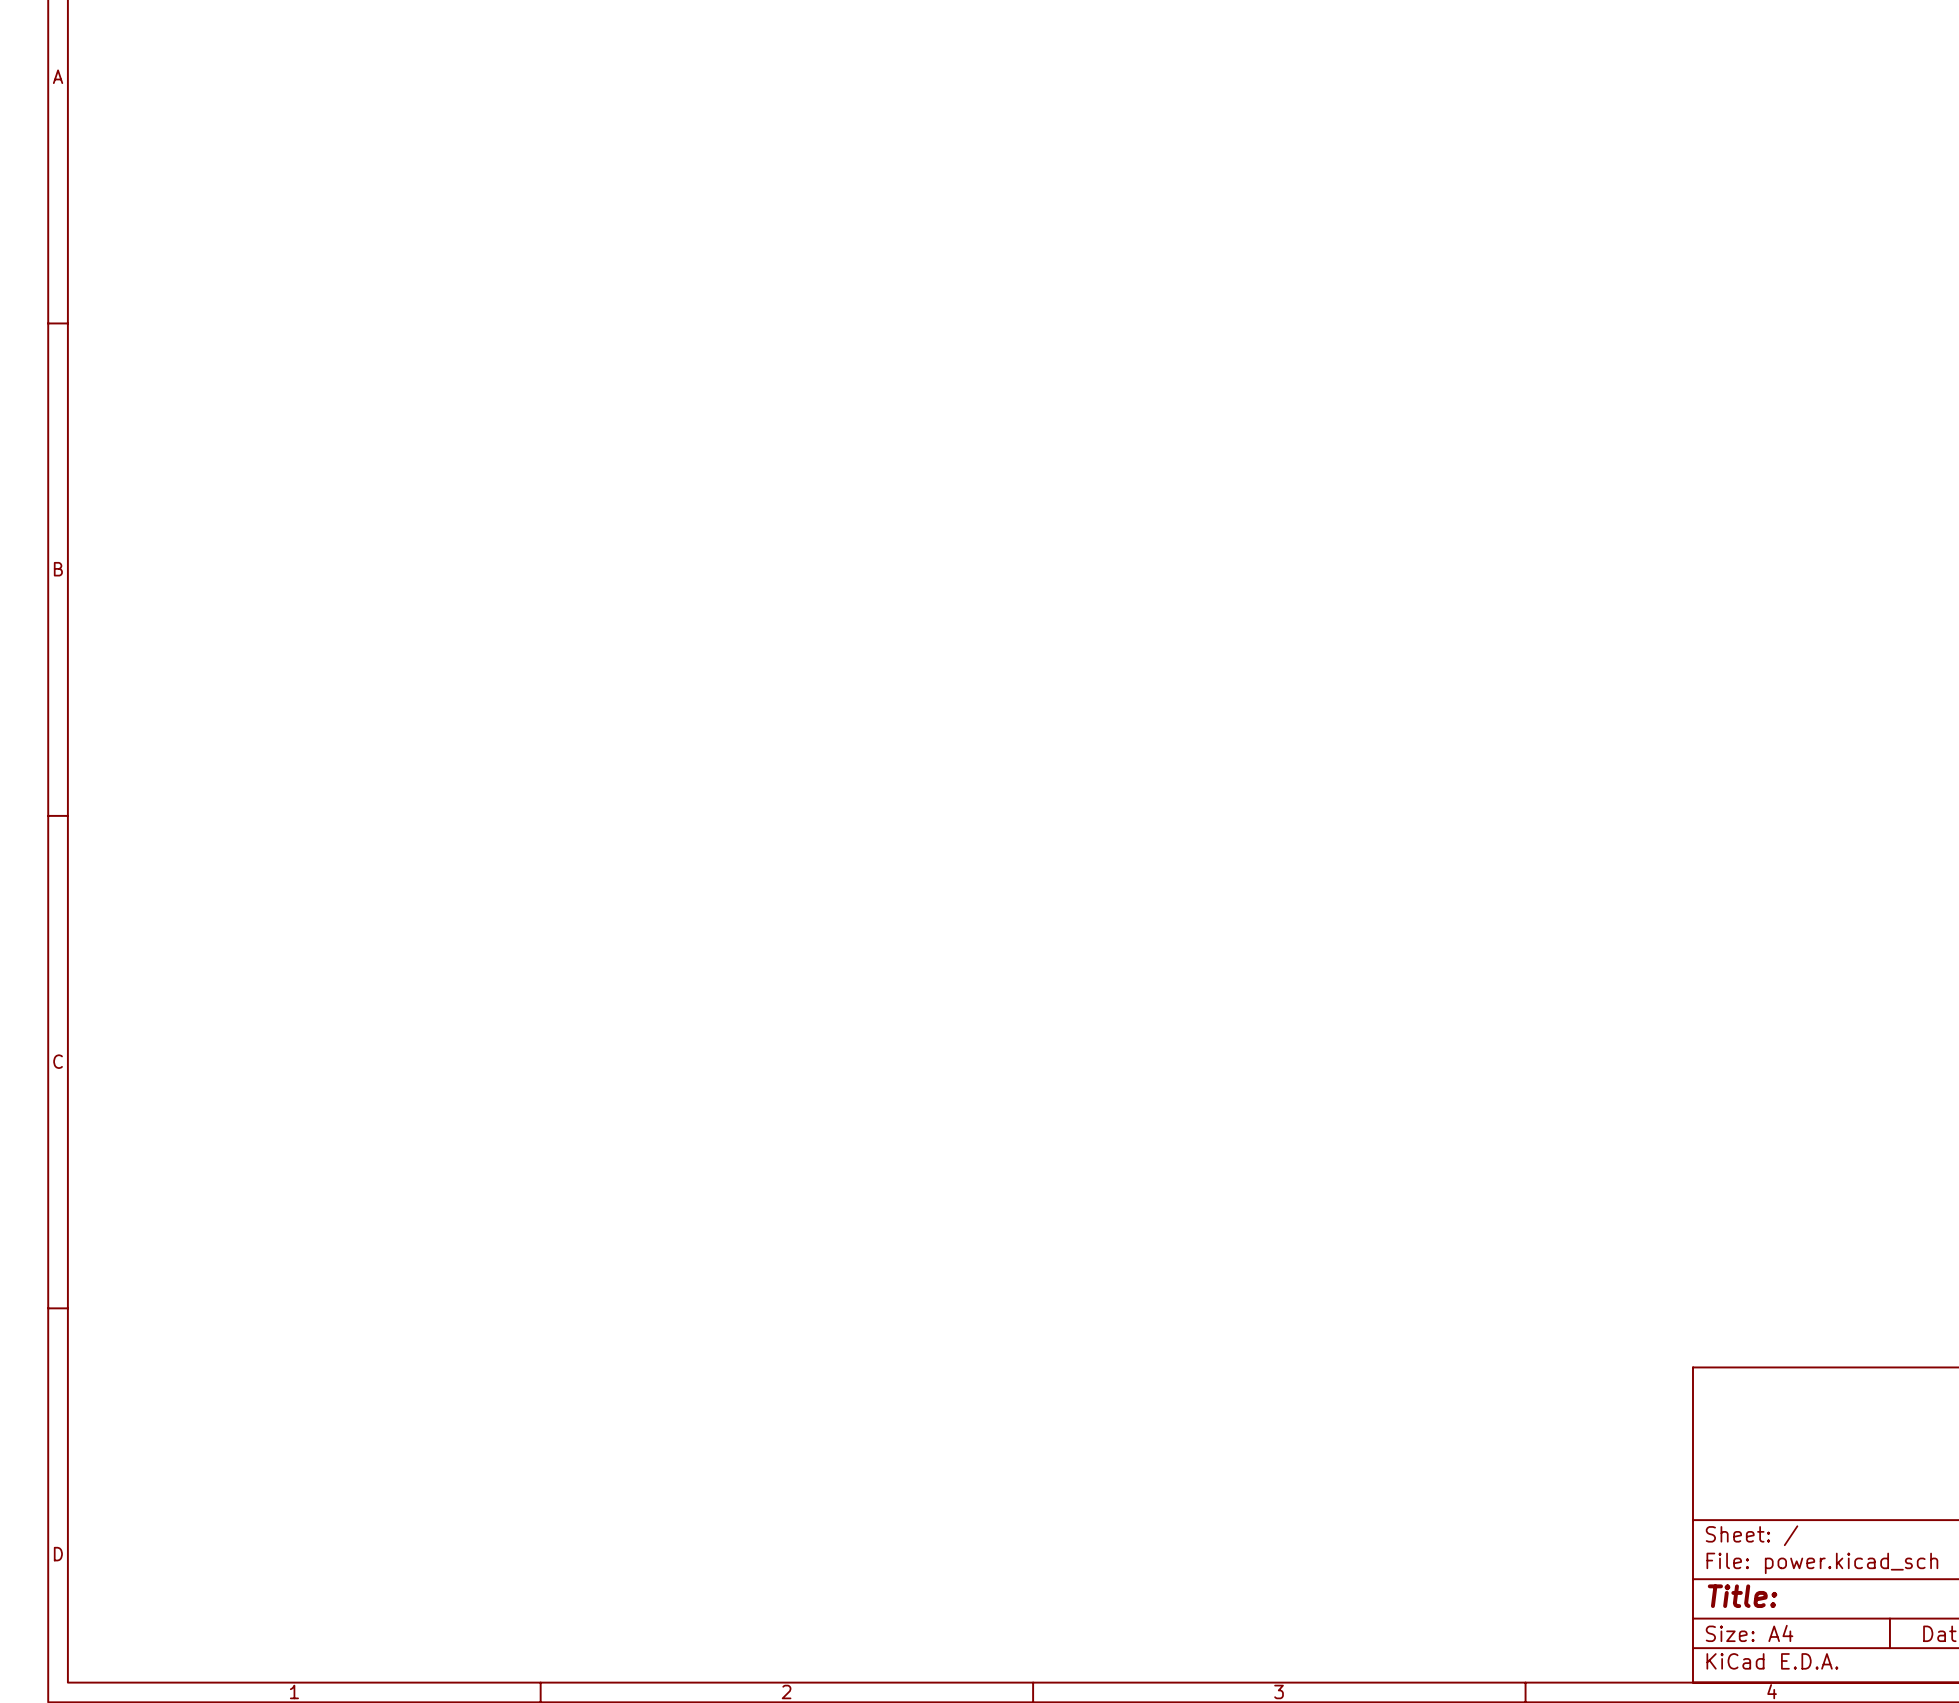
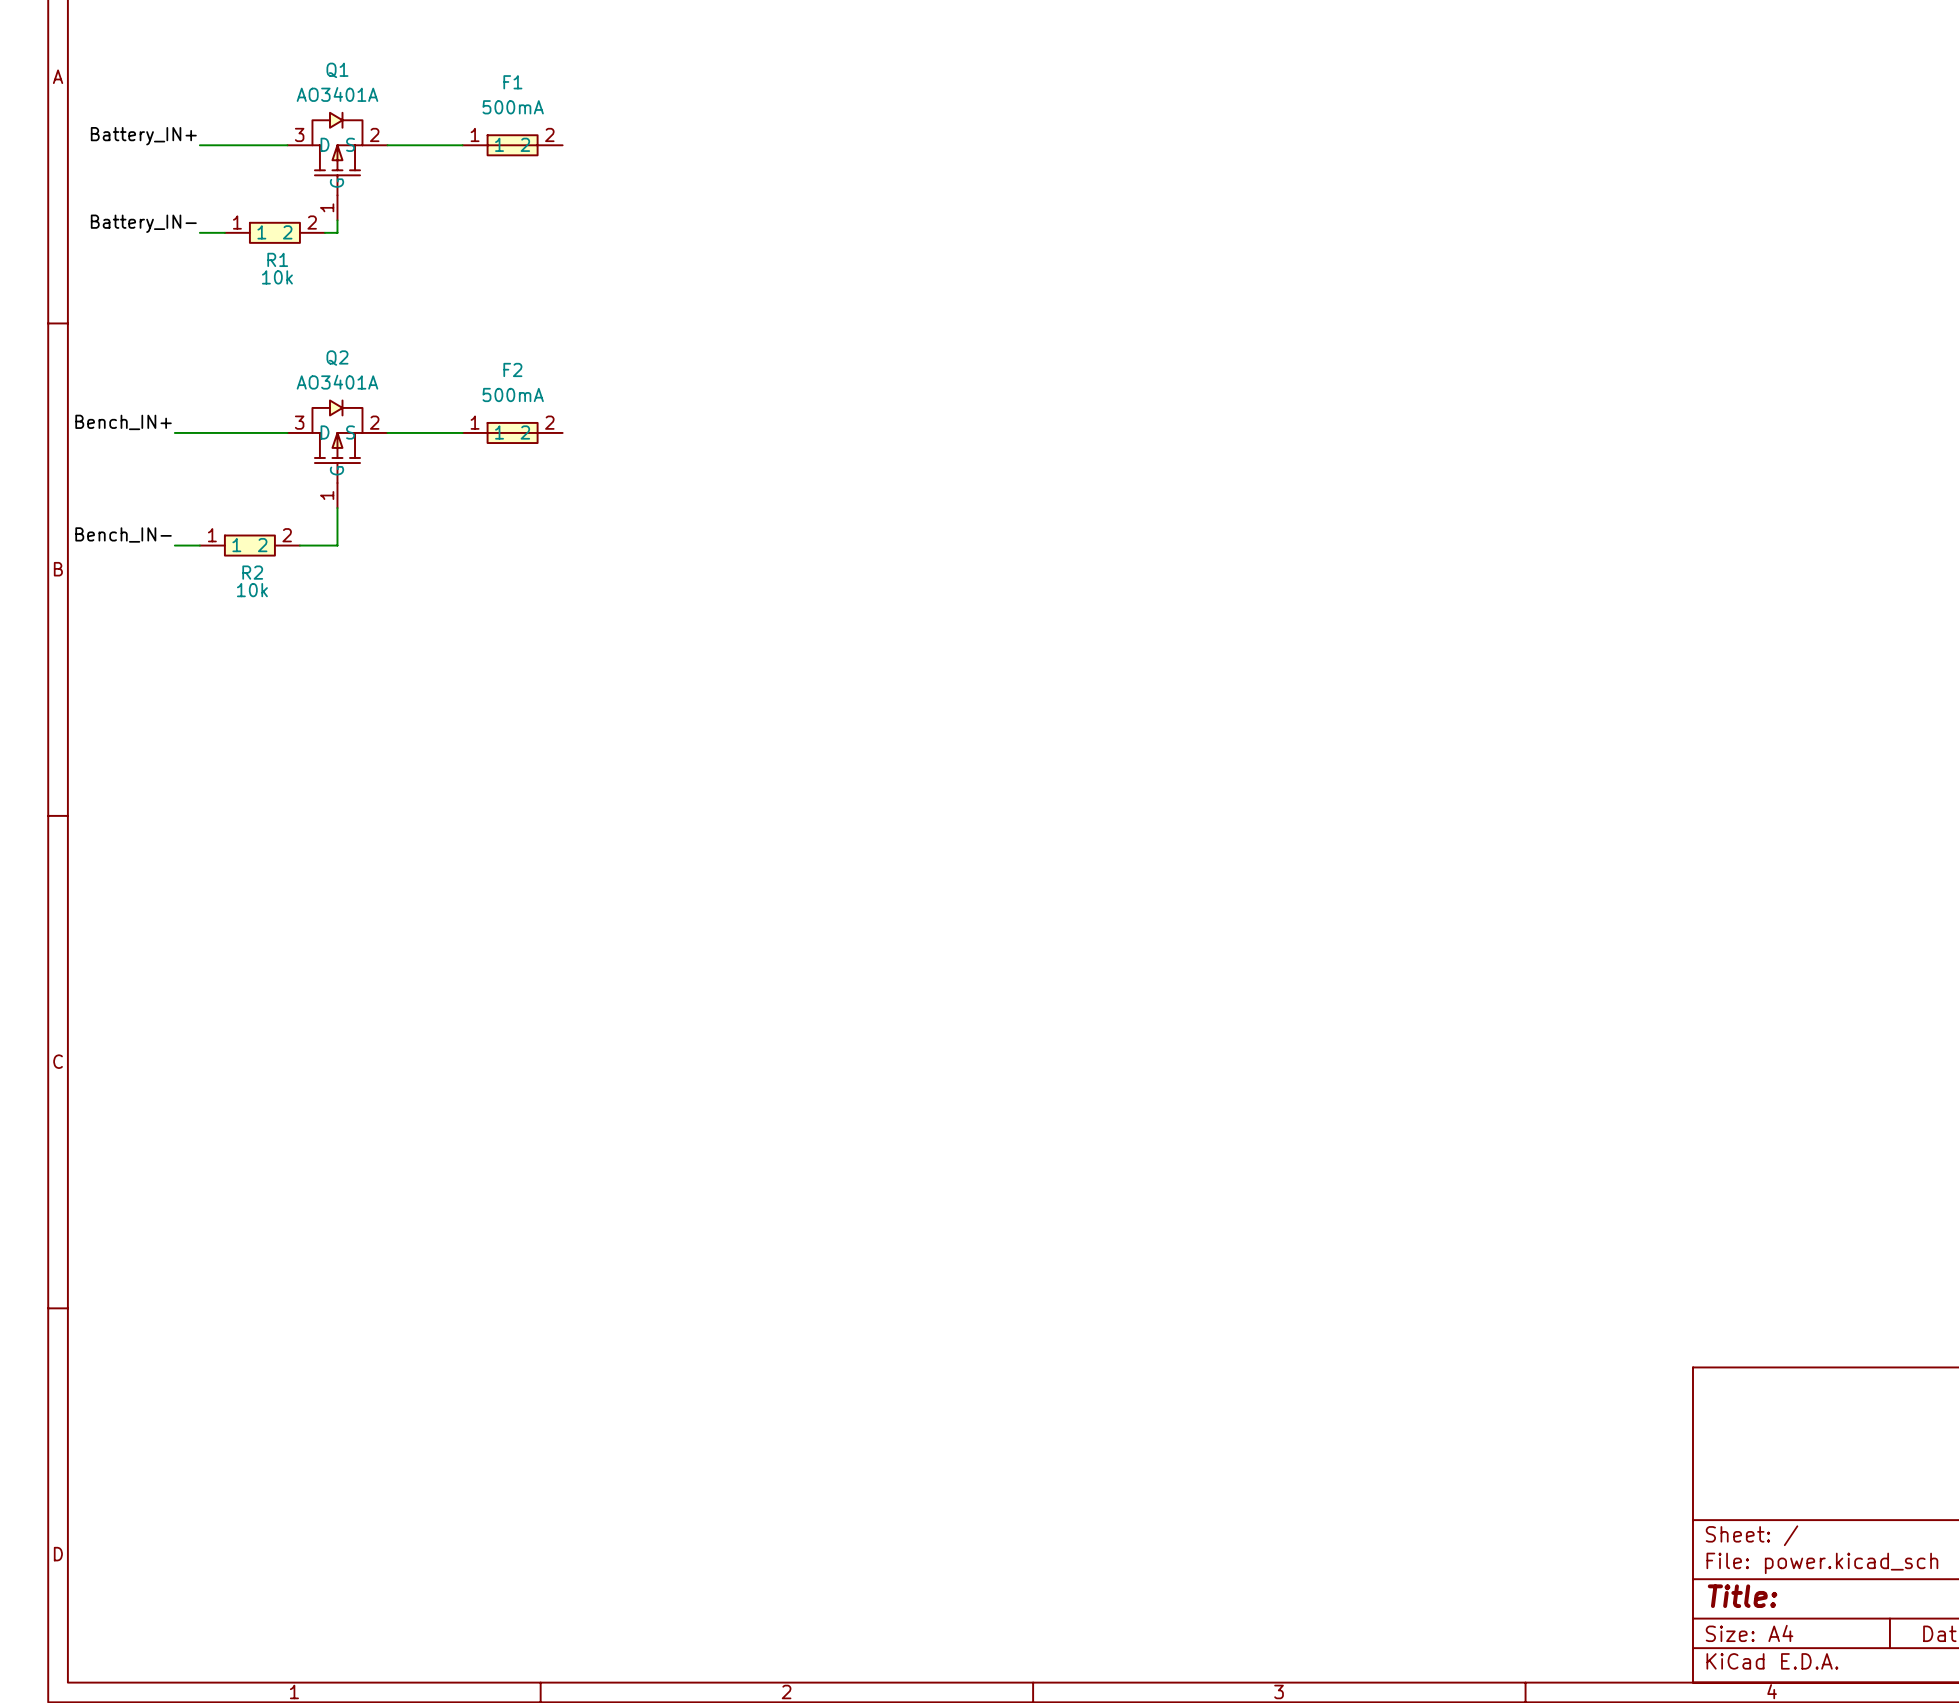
label: none -> Battery_IN+ (143, 136)
wire: none -> (199, 145) (287, 145)
wire: none -> (387, 145) (462, 145)
F1: none -> 500mA (512, 145)
Q1: none -> AO3401A (337, 166)
wire: none -> (337, 220) (337, 232) (324, 232)
label: none -> Battery_IN- (143, 223)
wire: none -> (199, 232) (224, 232)
R1: none -> 10k (274, 232)
label: none -> Bench_IN+ (123, 422)
wire: none -> (174, 432) (287, 432)
wire: none -> (387, 432) (462, 432)
F2: none -> 500mA (512, 432)
Q2: none -> AO3401A (337, 454)
wire: none -> (337, 508) (337, 545) (299, 545)
label: none -> Bench_IN- (123, 534)
wire: none -> (174, 545) (199, 545)
R2: none -> 10k (249, 545)

